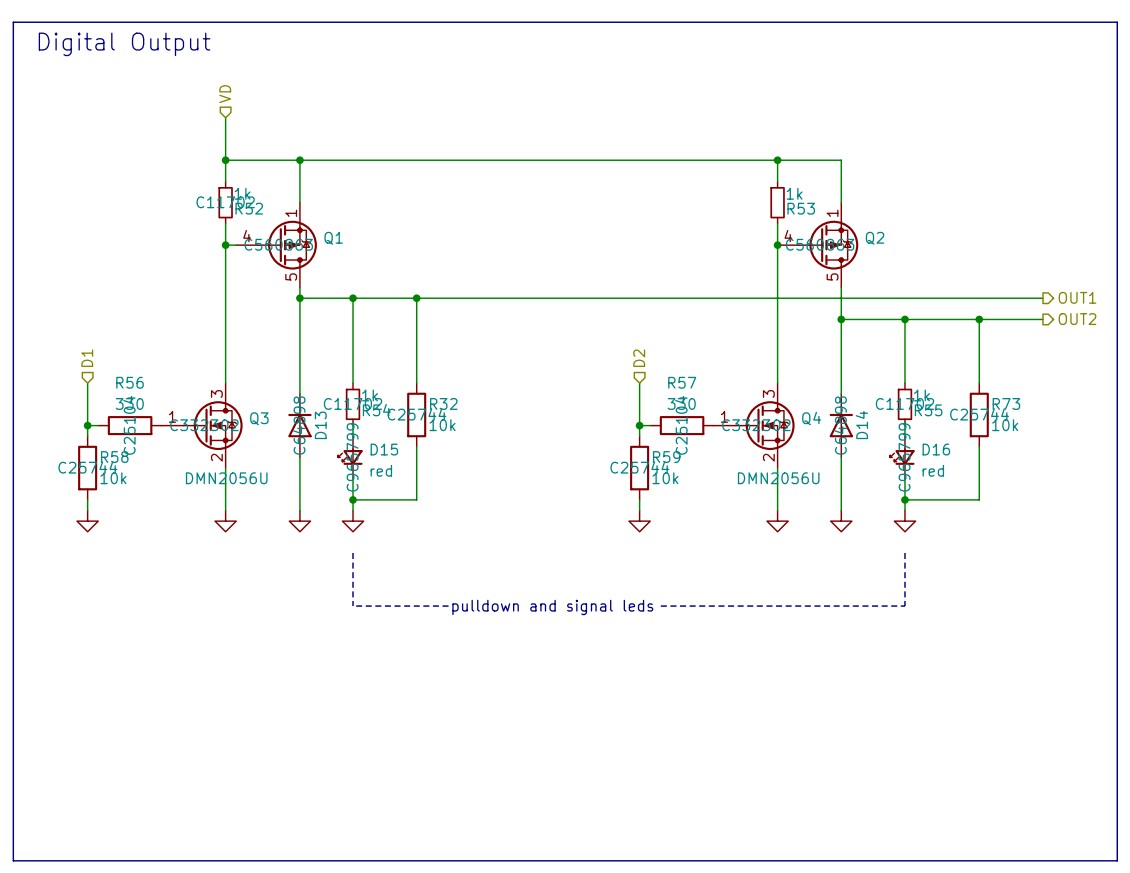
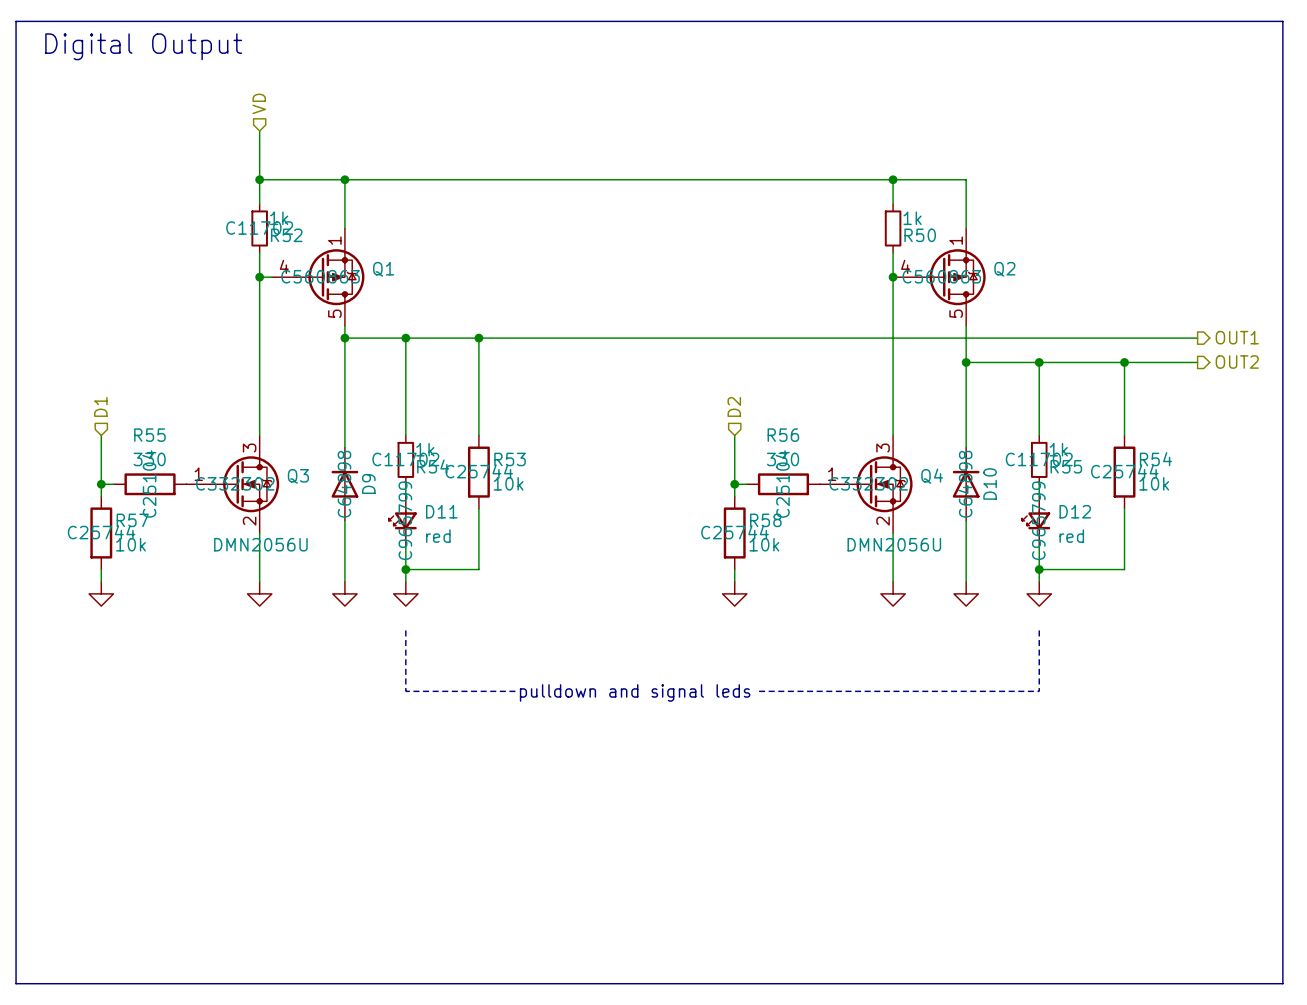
R53 name: R53 (801, 208) -> R50 (920, 235)
R56 name: R56 (130, 382) -> R55 (149, 435)
R57 name: R57 (682, 382) -> R56 (783, 435)
R32 name: R32 (443, 403) -> R53 (510, 459)
R73 name: R73 (1006, 403) -> R54 (1155, 459)
D13 name: D13 (320, 425) -> D9 (368, 483)
D14 name: D14 (861, 425) -> D10 (990, 483)
D15 name: D15 (384, 449) -> D11 (441, 511)
D16 name: D16 (936, 449) -> D12 (1075, 511)
R58 name: R58 (114, 457) -> R57 (132, 520)
R59 name: R59 (666, 457) -> R58 (765, 520)

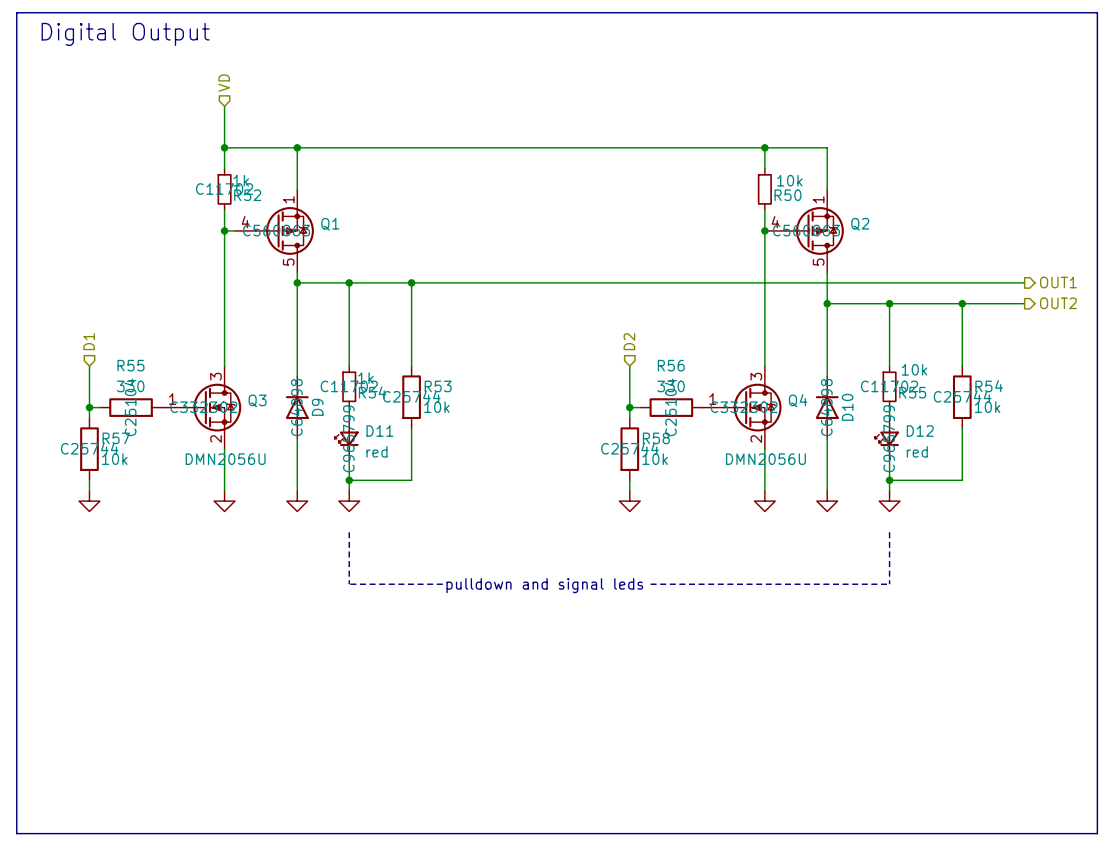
R50 value: 1k (912, 218) -> 10k (789, 180)
R55 value: 1k (1058, 449) -> 10k (914, 369)

